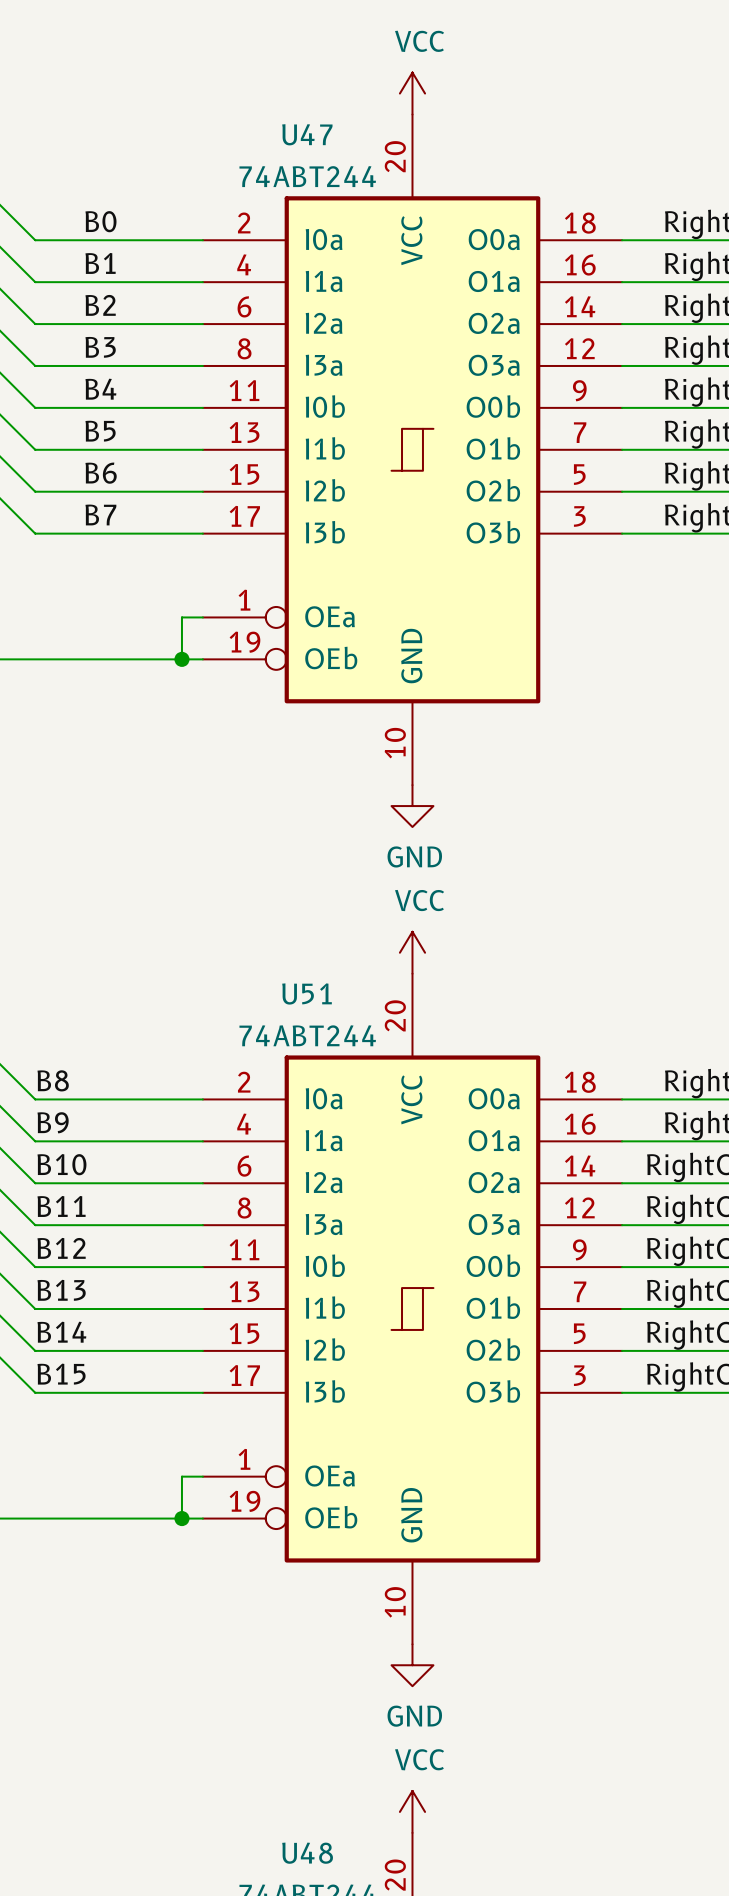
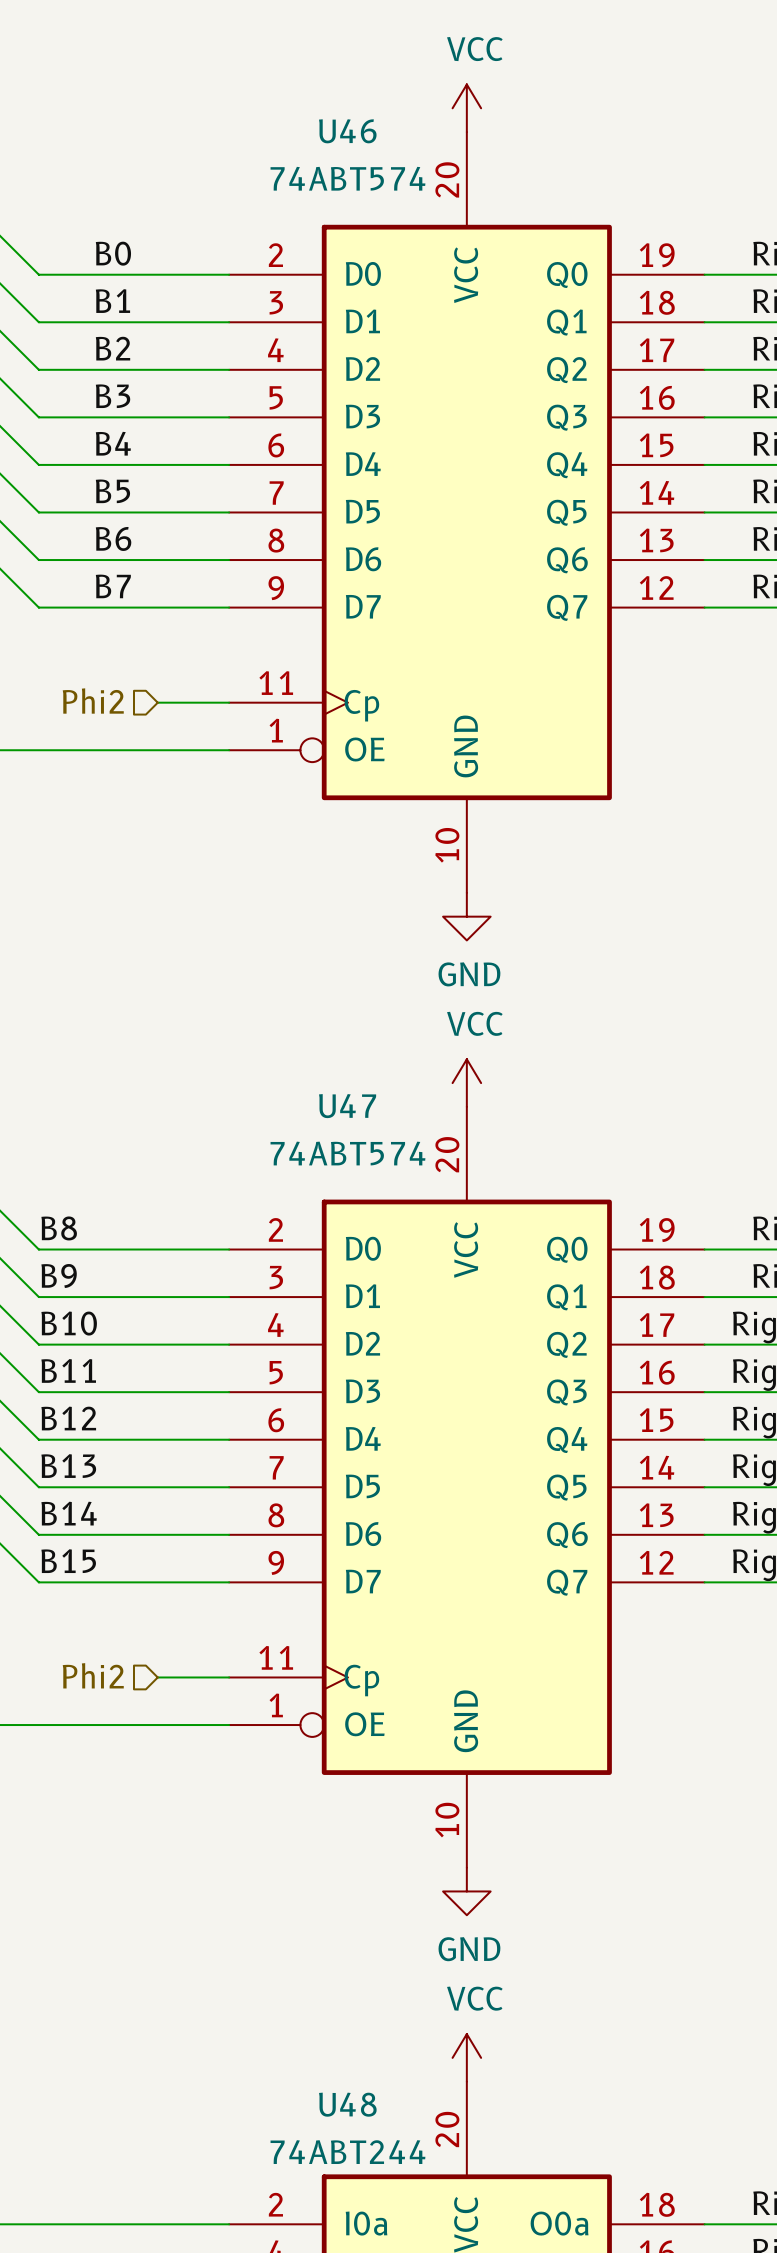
U47 symbol: [202, 114, 623, 786] -> [229, 1106, 705, 1868]
U47 value: 74ABT244 (307, 176) -> 74ABT574 (347, 1153)
U46: none -> 74ABT574 (466, 512)
hierarchical label: none -> Phi2 (93, 701)
wire: (181, 617) (181, 659) -> (205, 702) (157, 702)
junction: (181, 659) -> none
U51: 74ABT244 (412, 1309) -> none
hierarchical label: none -> Phi2 (93, 1675)
wire: (181, 1476) (181, 1518) -> (205, 1677) (157, 1677)
junction: (181, 1518) -> none

